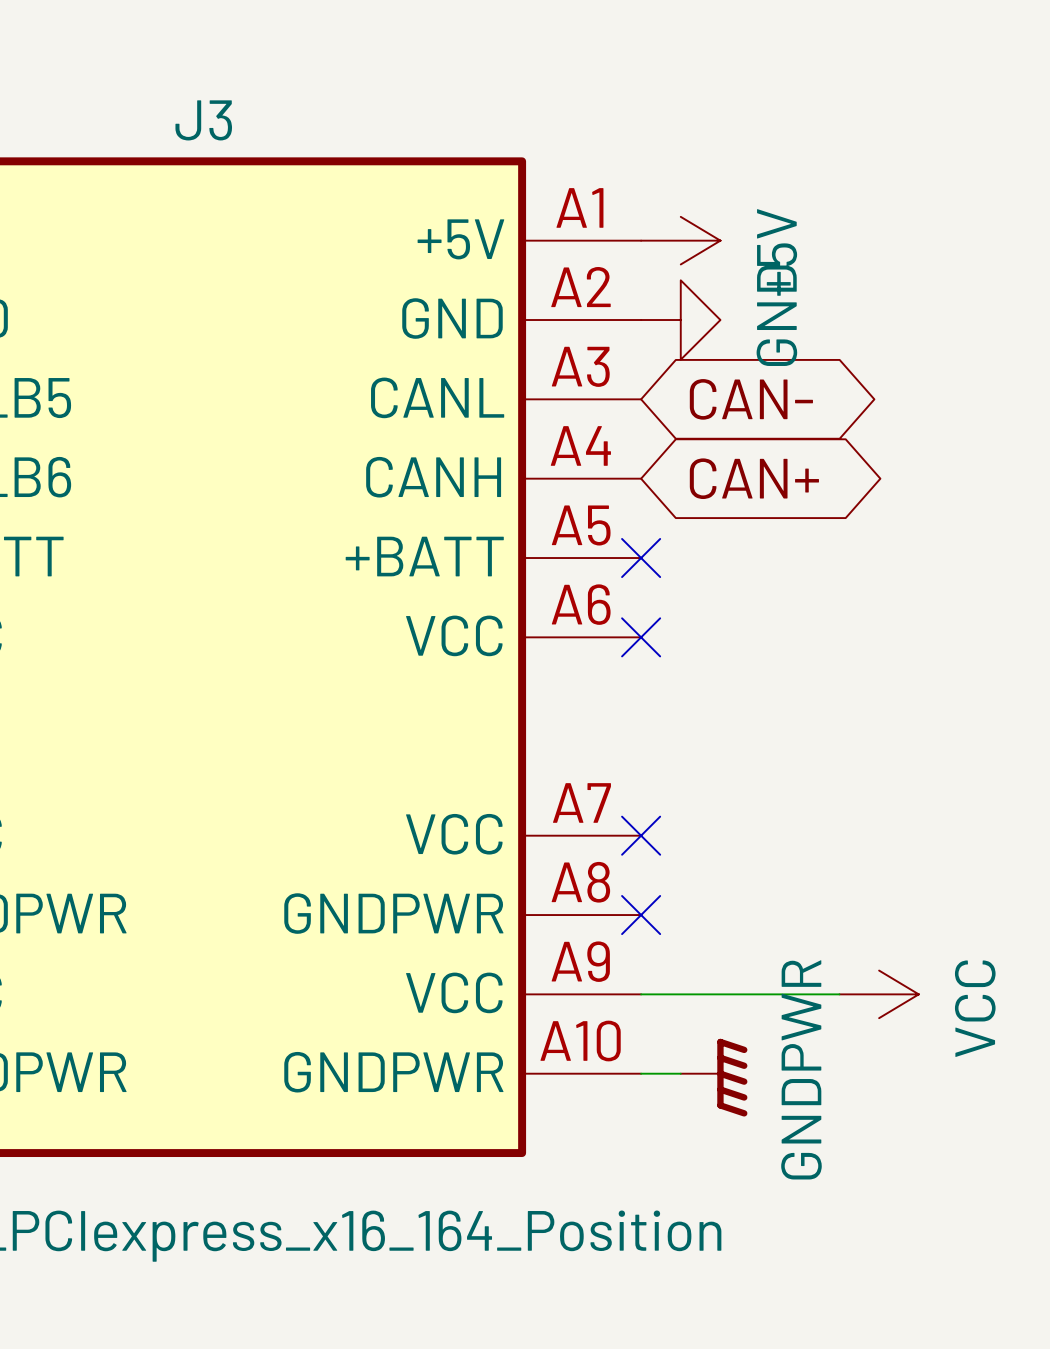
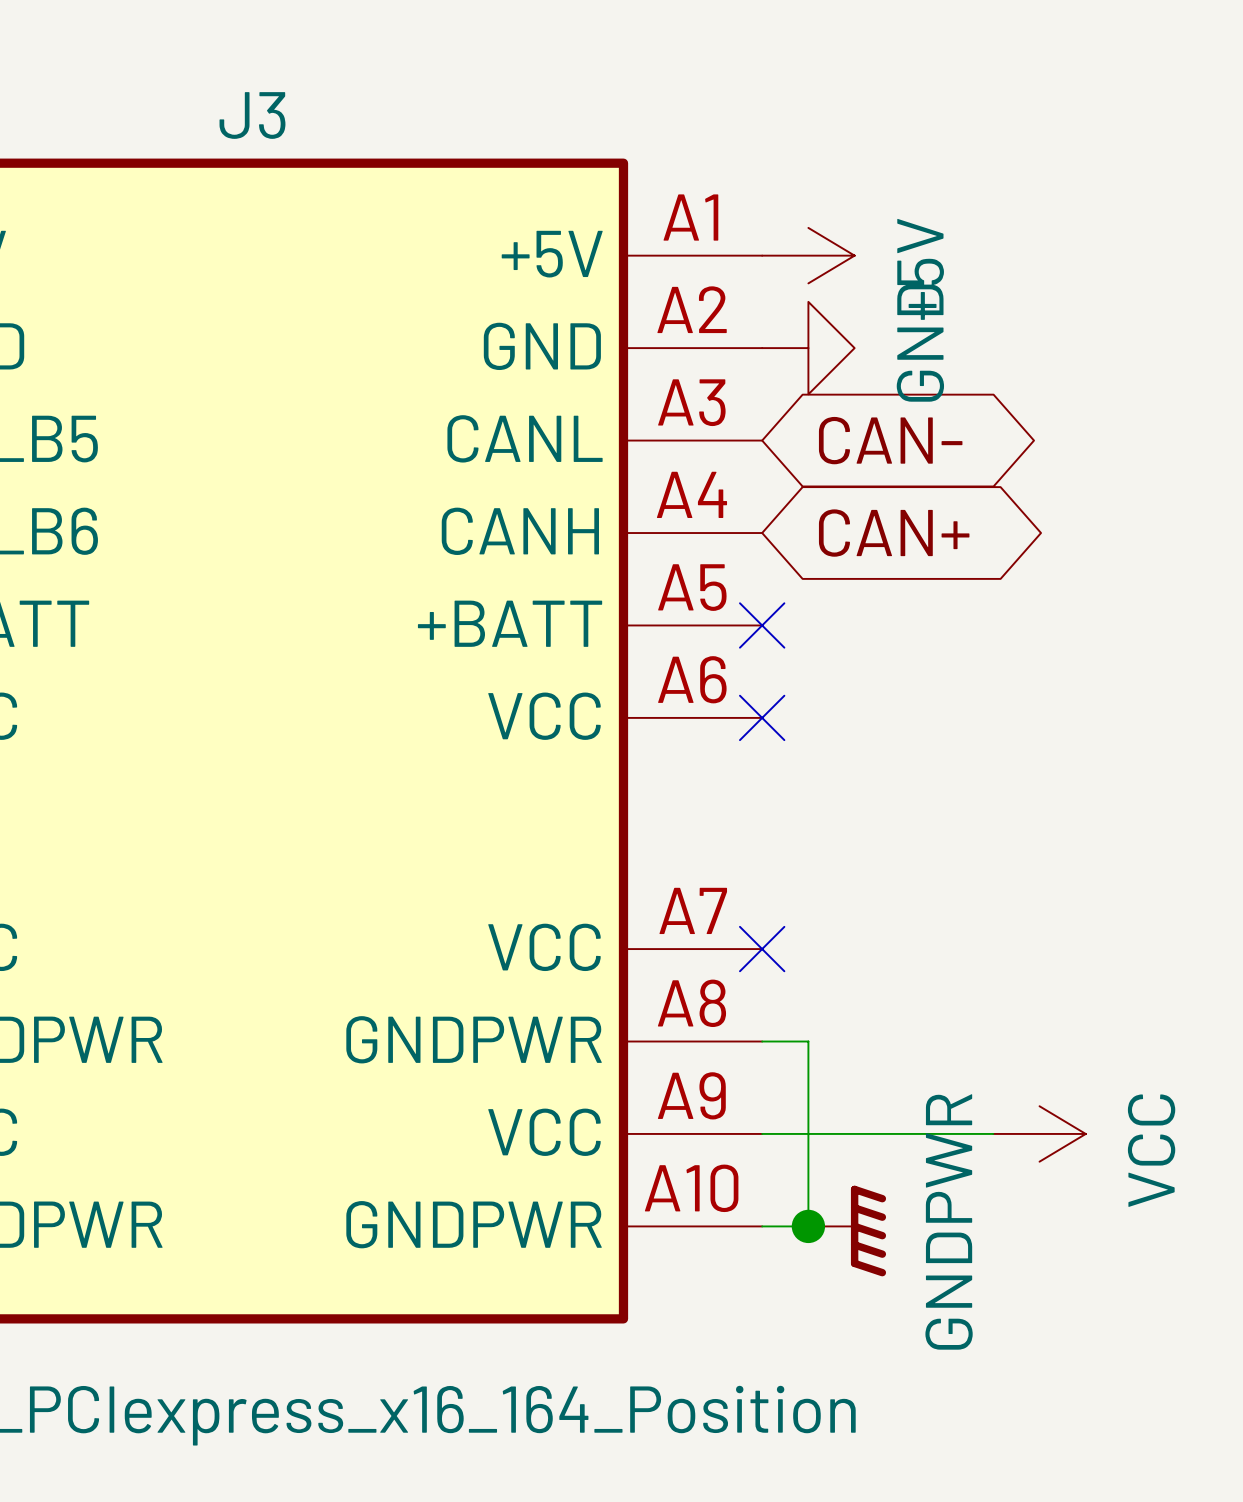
wire: none -> (762, 1041) (808, 1041) (808, 1226)
no-connect mark: (641, 915) -> none
junction: none -> (808, 1226)

